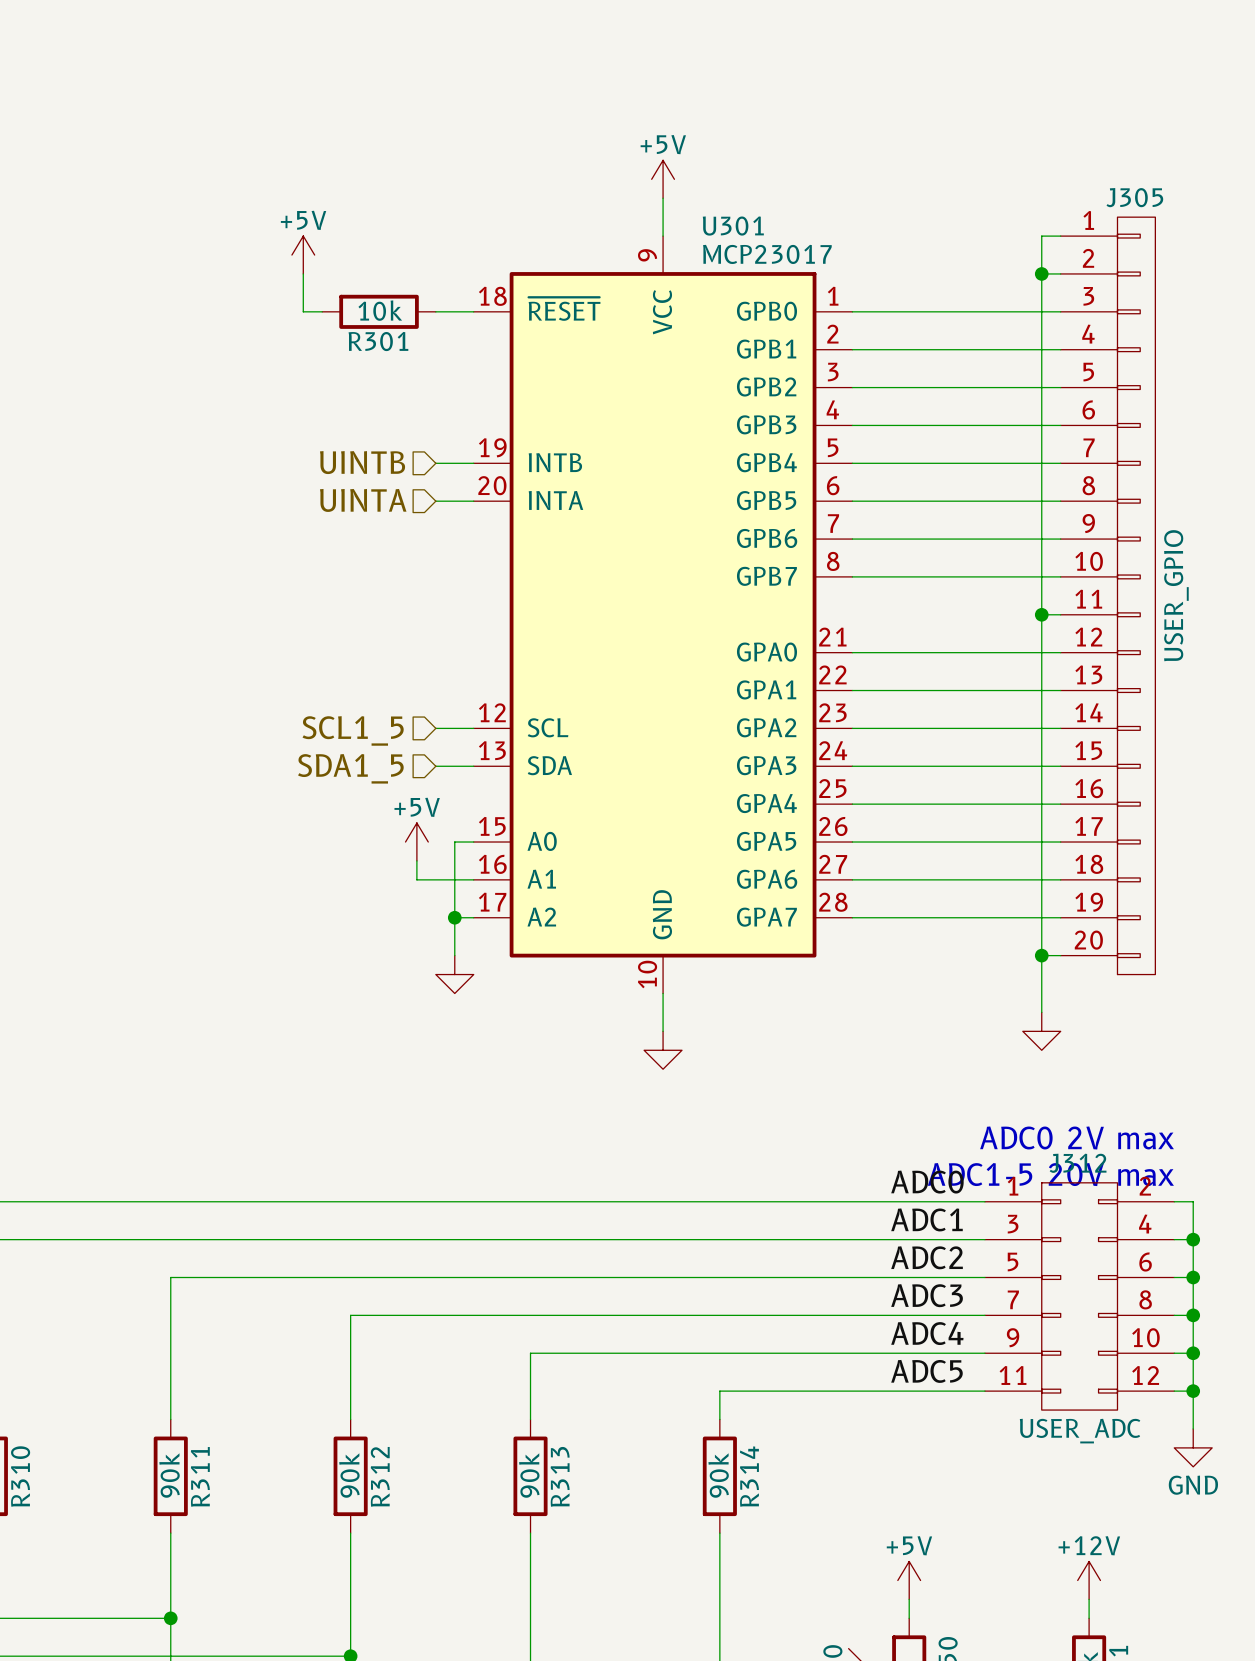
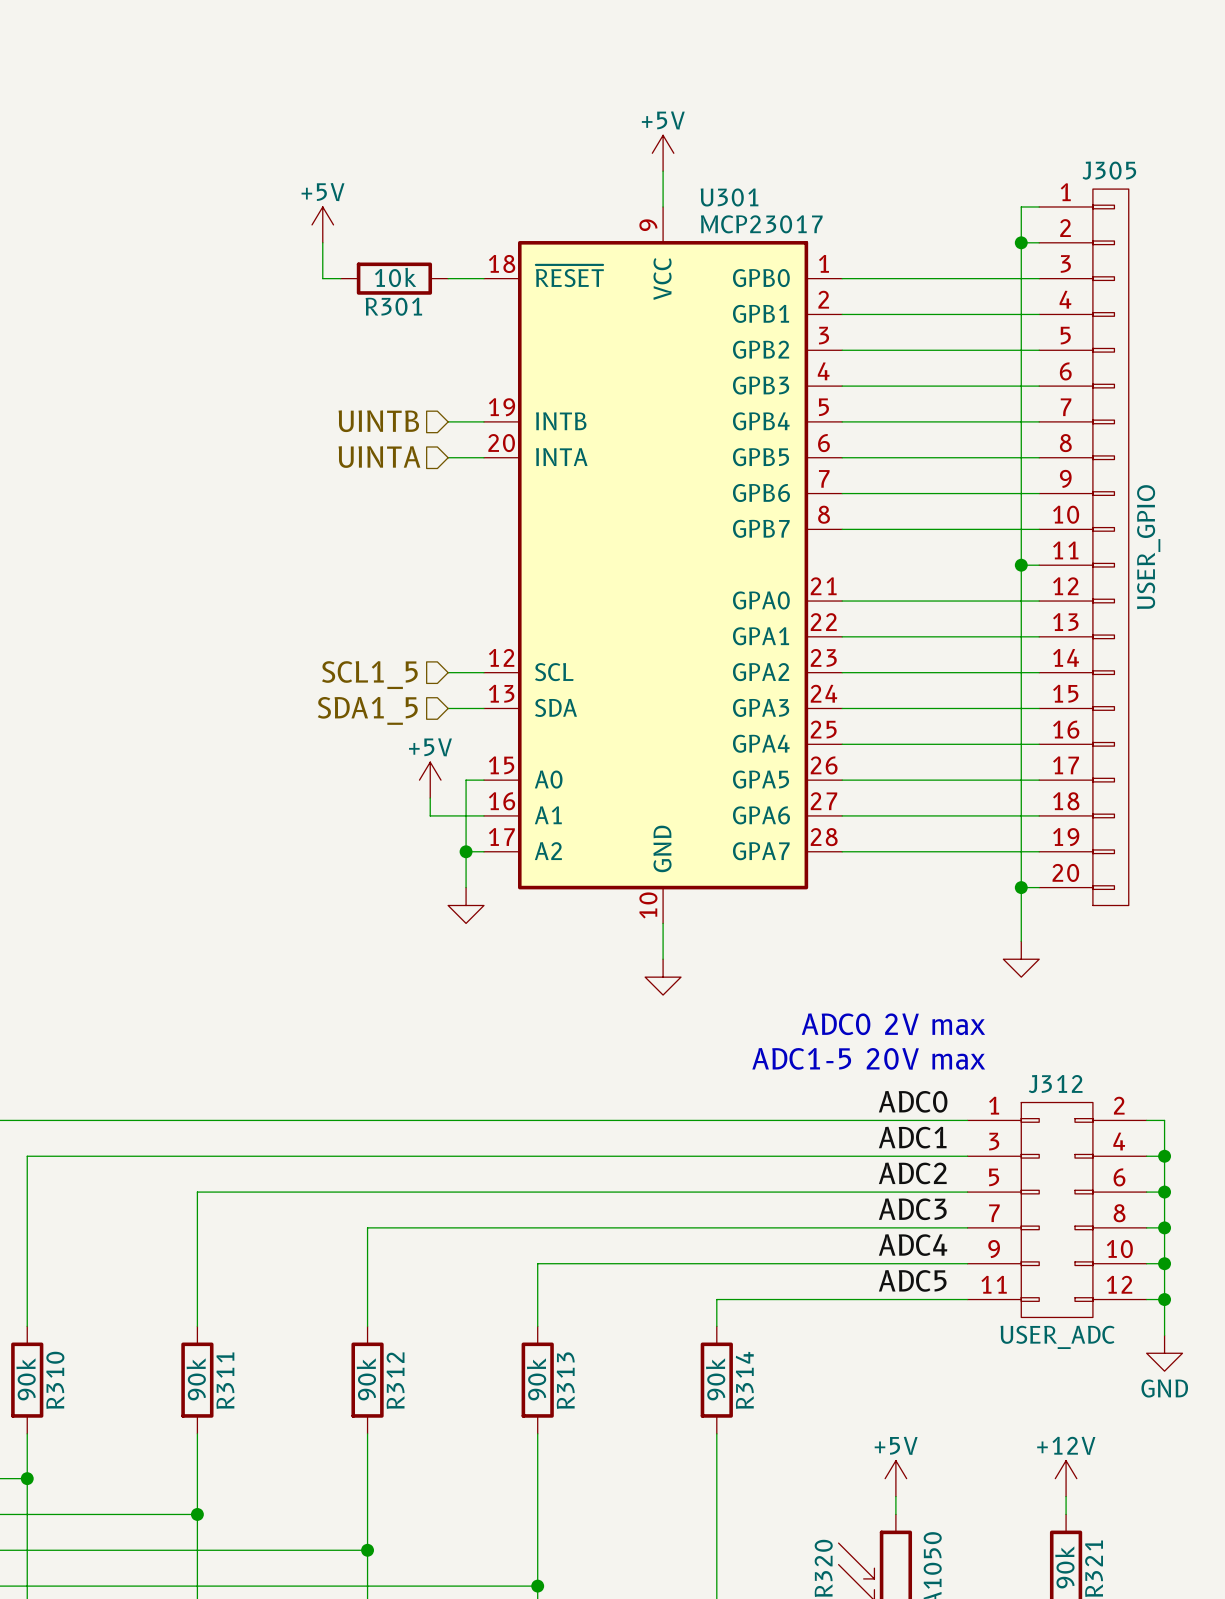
text position: ADC0 2V max (1077, 1137) -> ADC0 2V max (893, 1024)
text position: ADC1-5 20V max (1050, 1174) -> ADC1-5 20V max (868, 1058)

